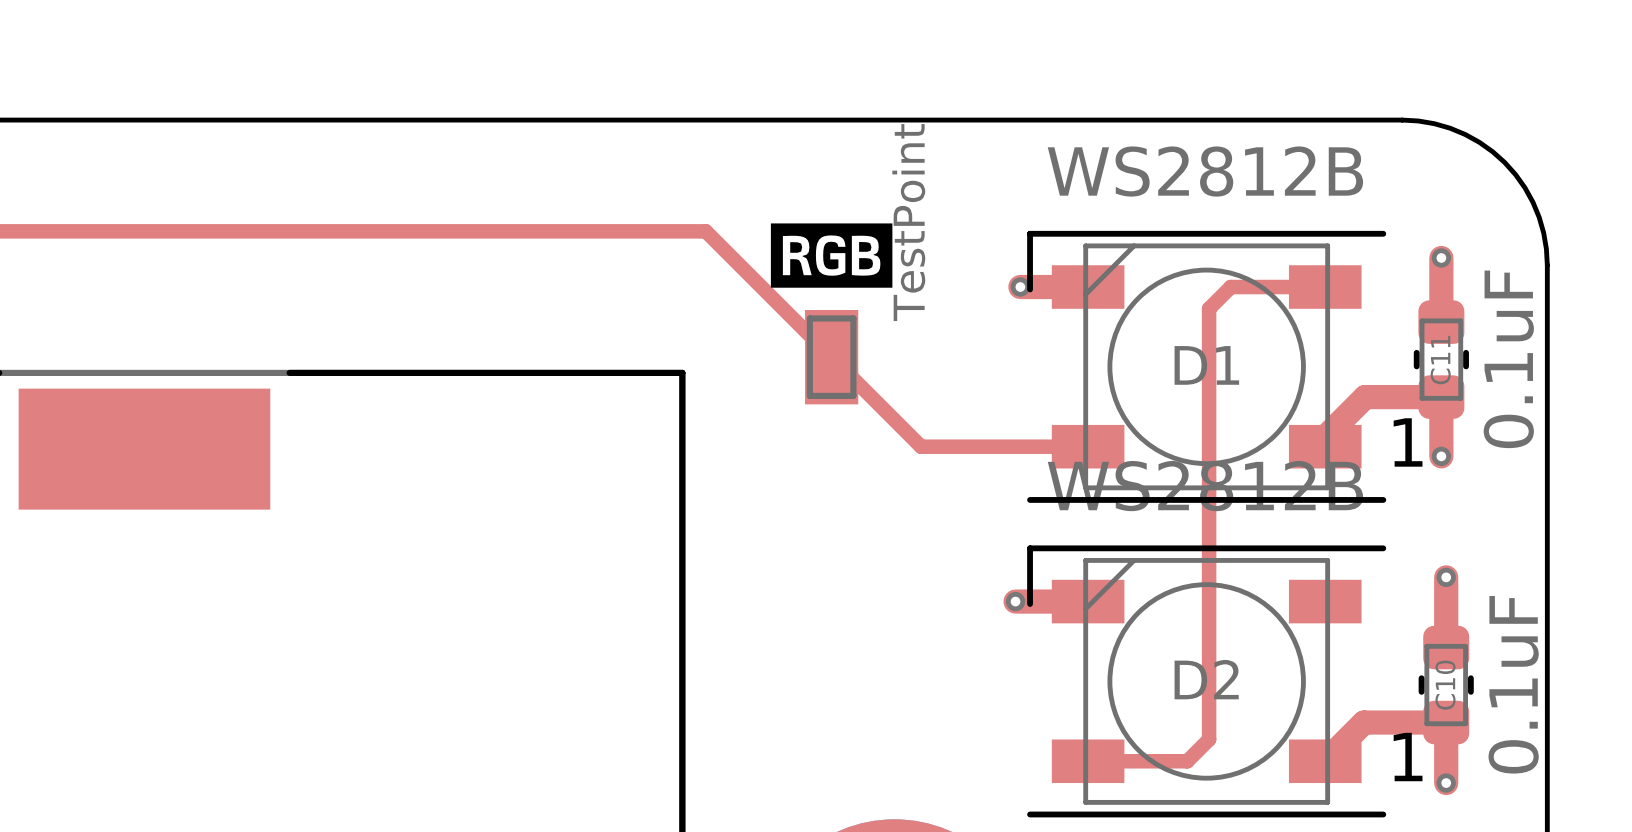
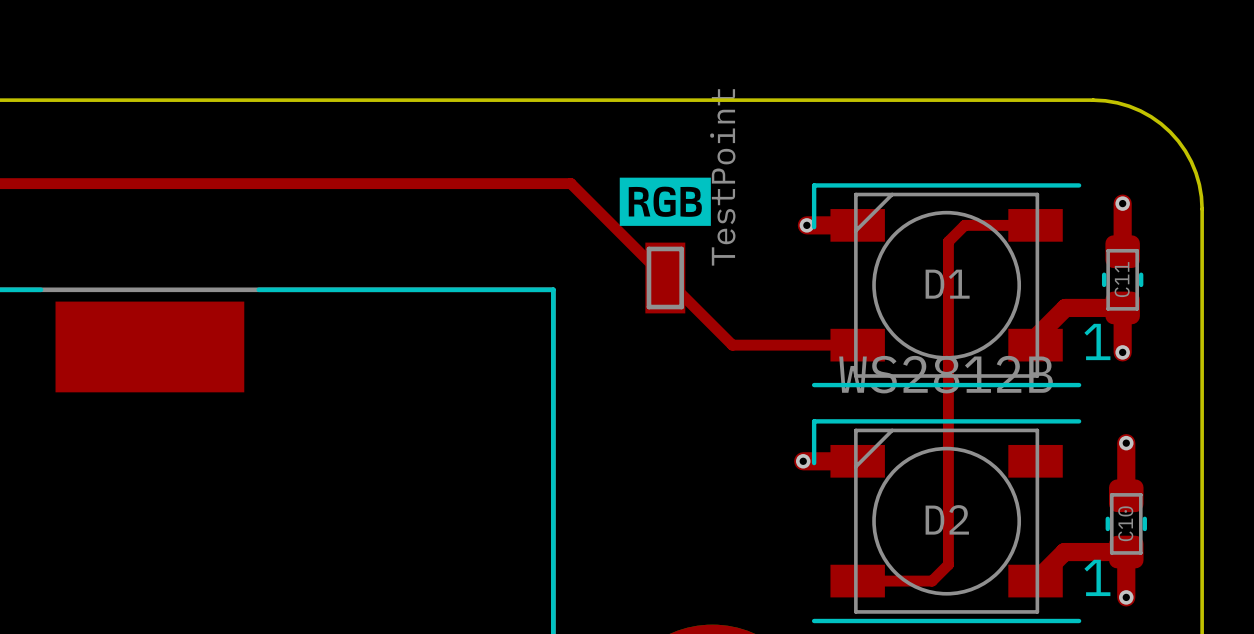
D1 value: WS2812B (1205, 171) -> none
C11 value: 0.1uF (1508, 359) -> none
C10 value: 0.1uF (1513, 684) -> none

